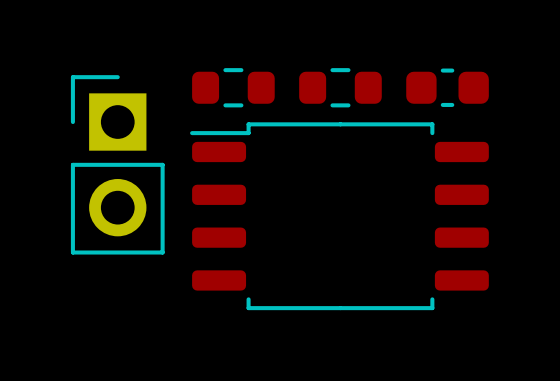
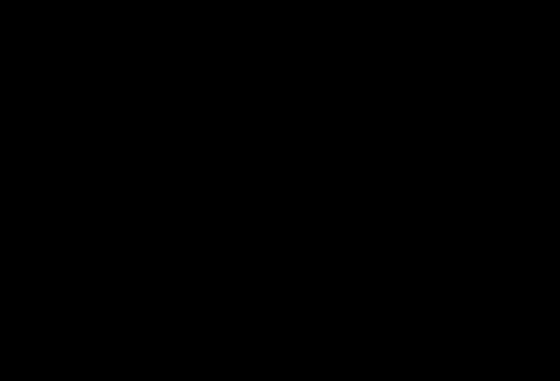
part: (233, 87) -> none
part: (340, 87) -> none
part: (447, 87) -> none
part: (117, 164) -> none
part: (339, 216) -> none

